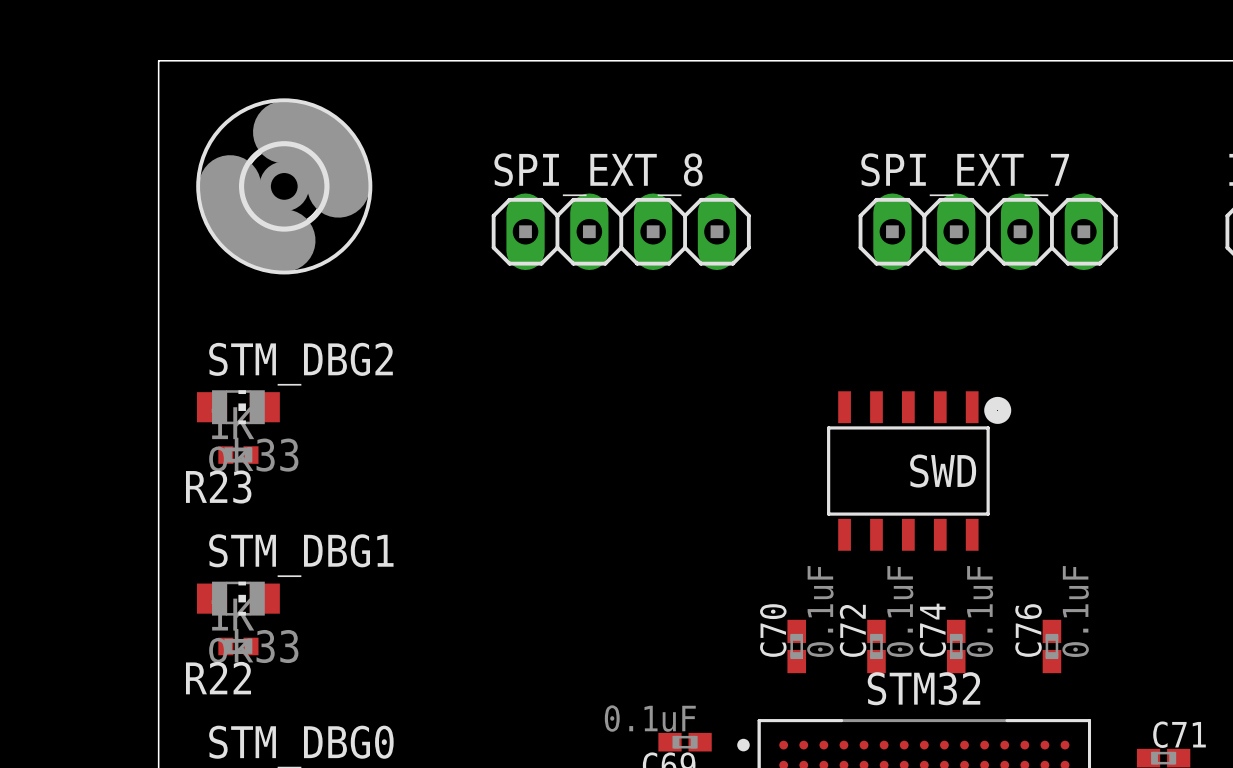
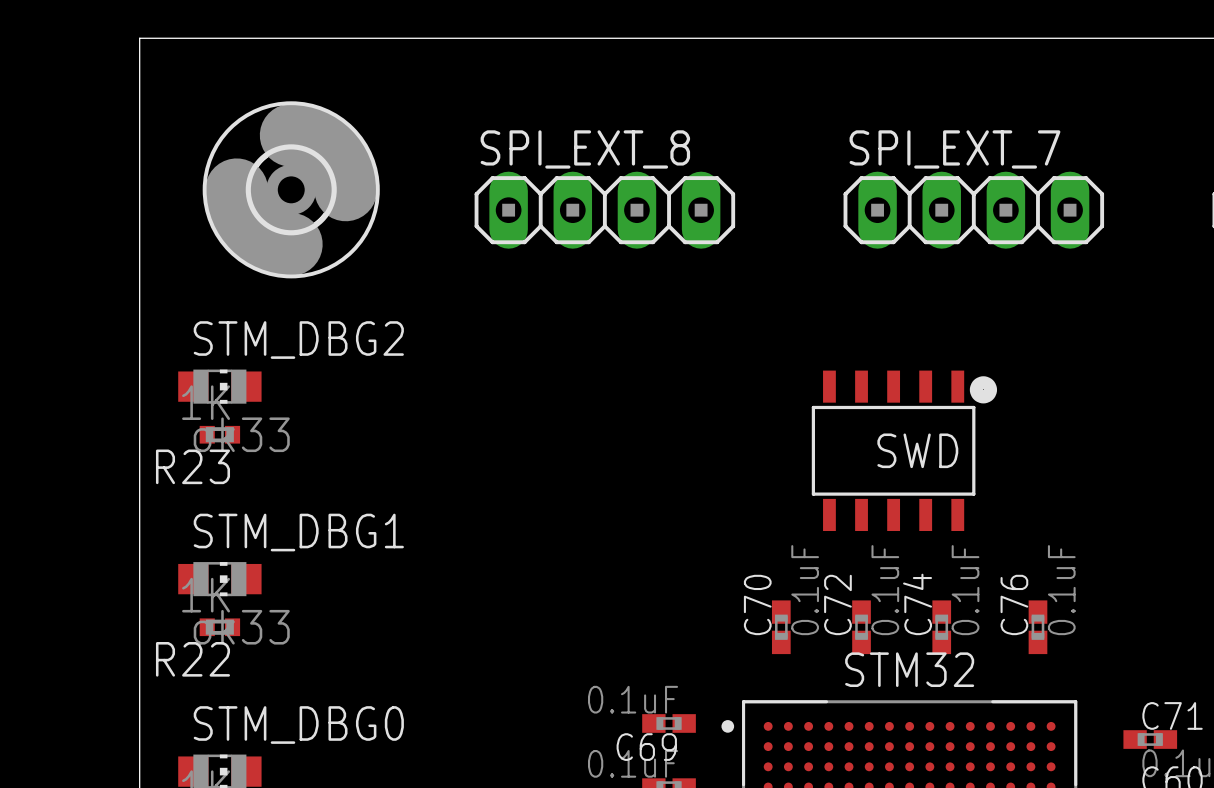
part position: (284, 186) -> (291, 189)

